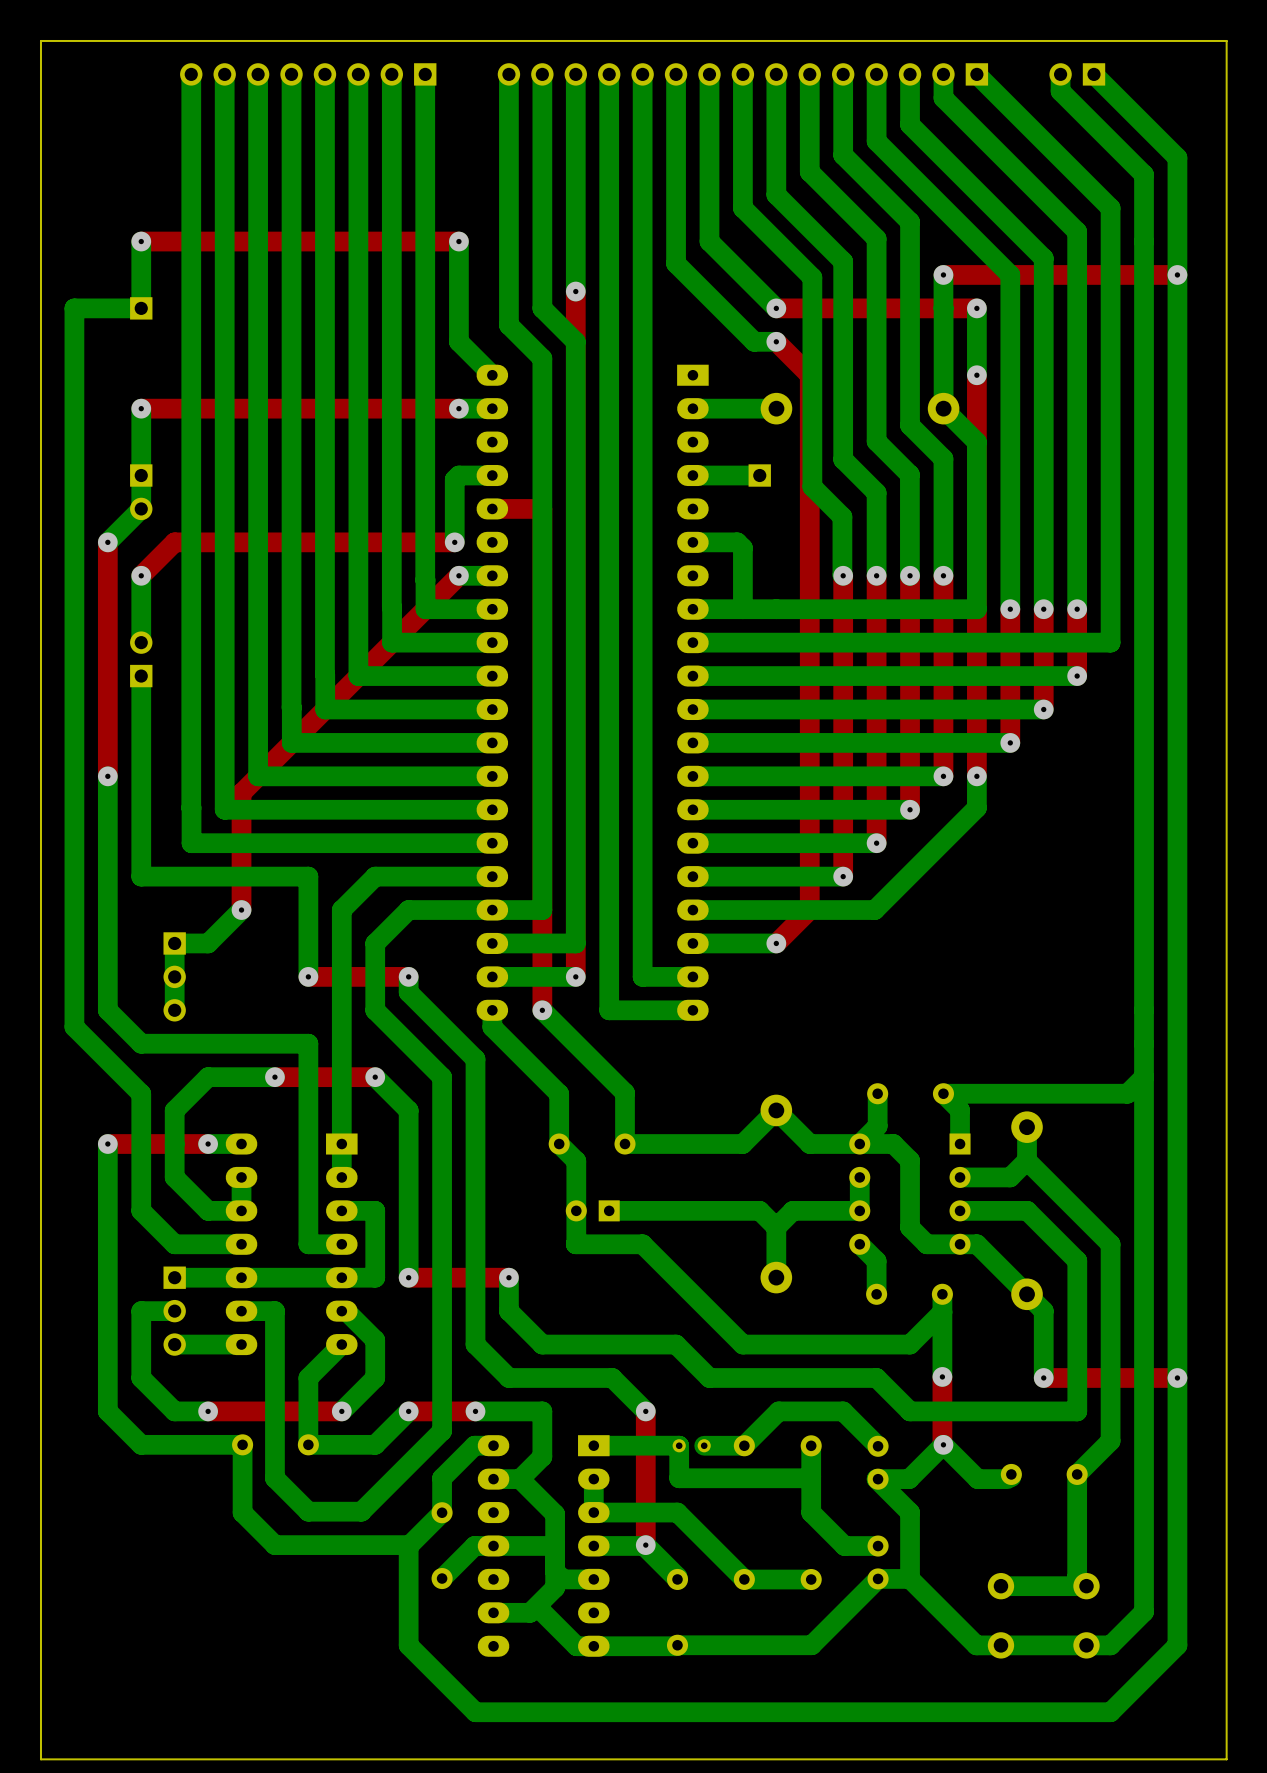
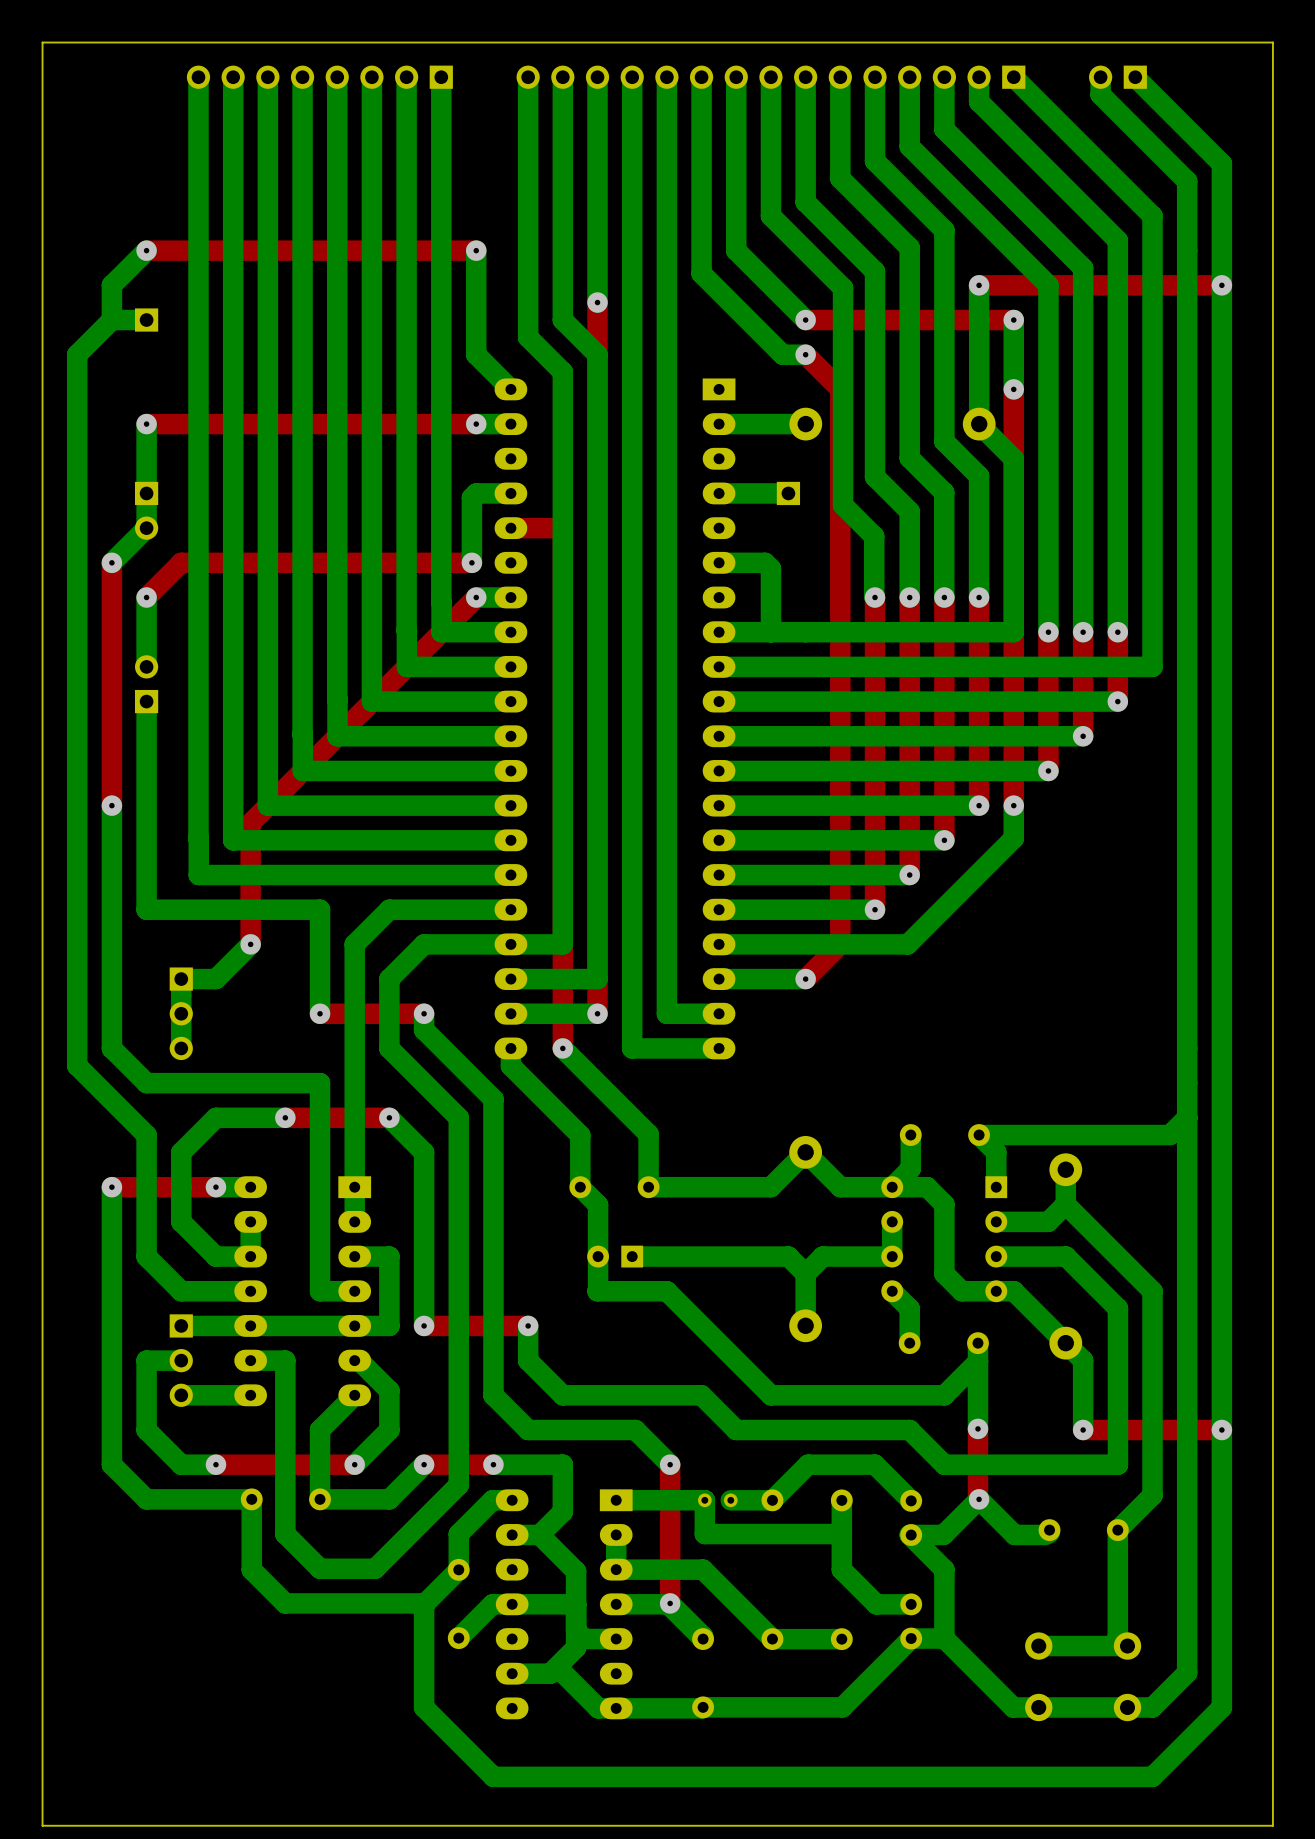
bottom track: (141, 241) (141, 308) -> (146, 250) (111, 285) (111, 320) (77, 354)
bottom track: (107, 308) (74, 308) (74, 341) -> none

